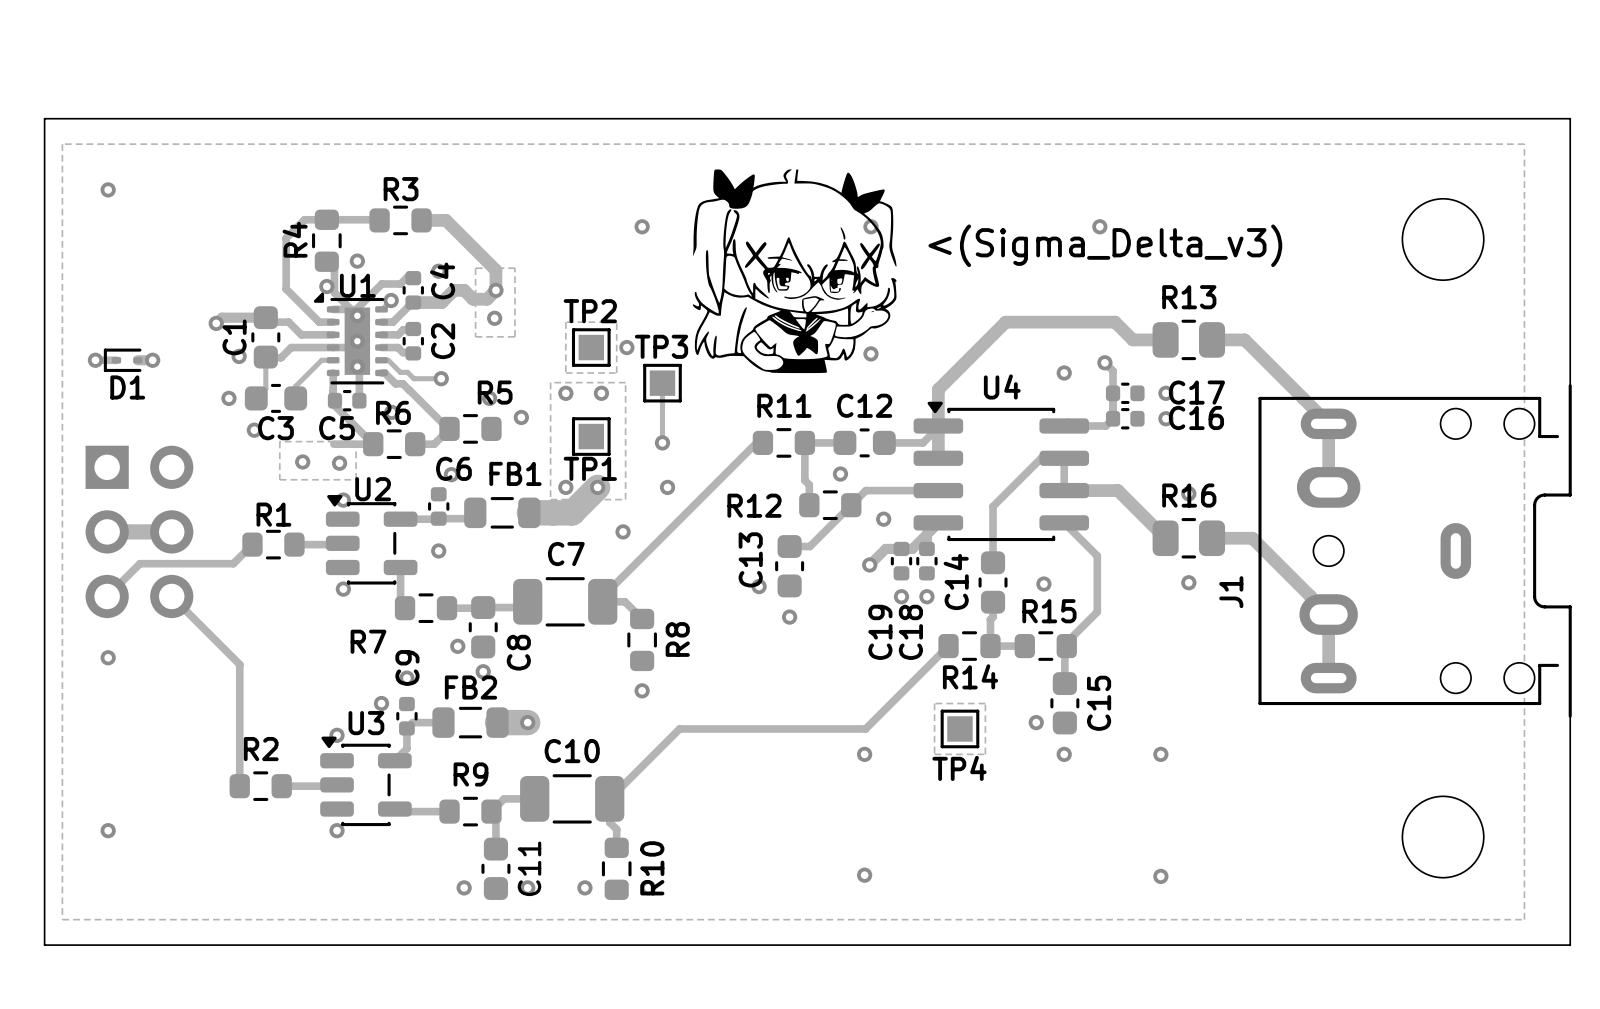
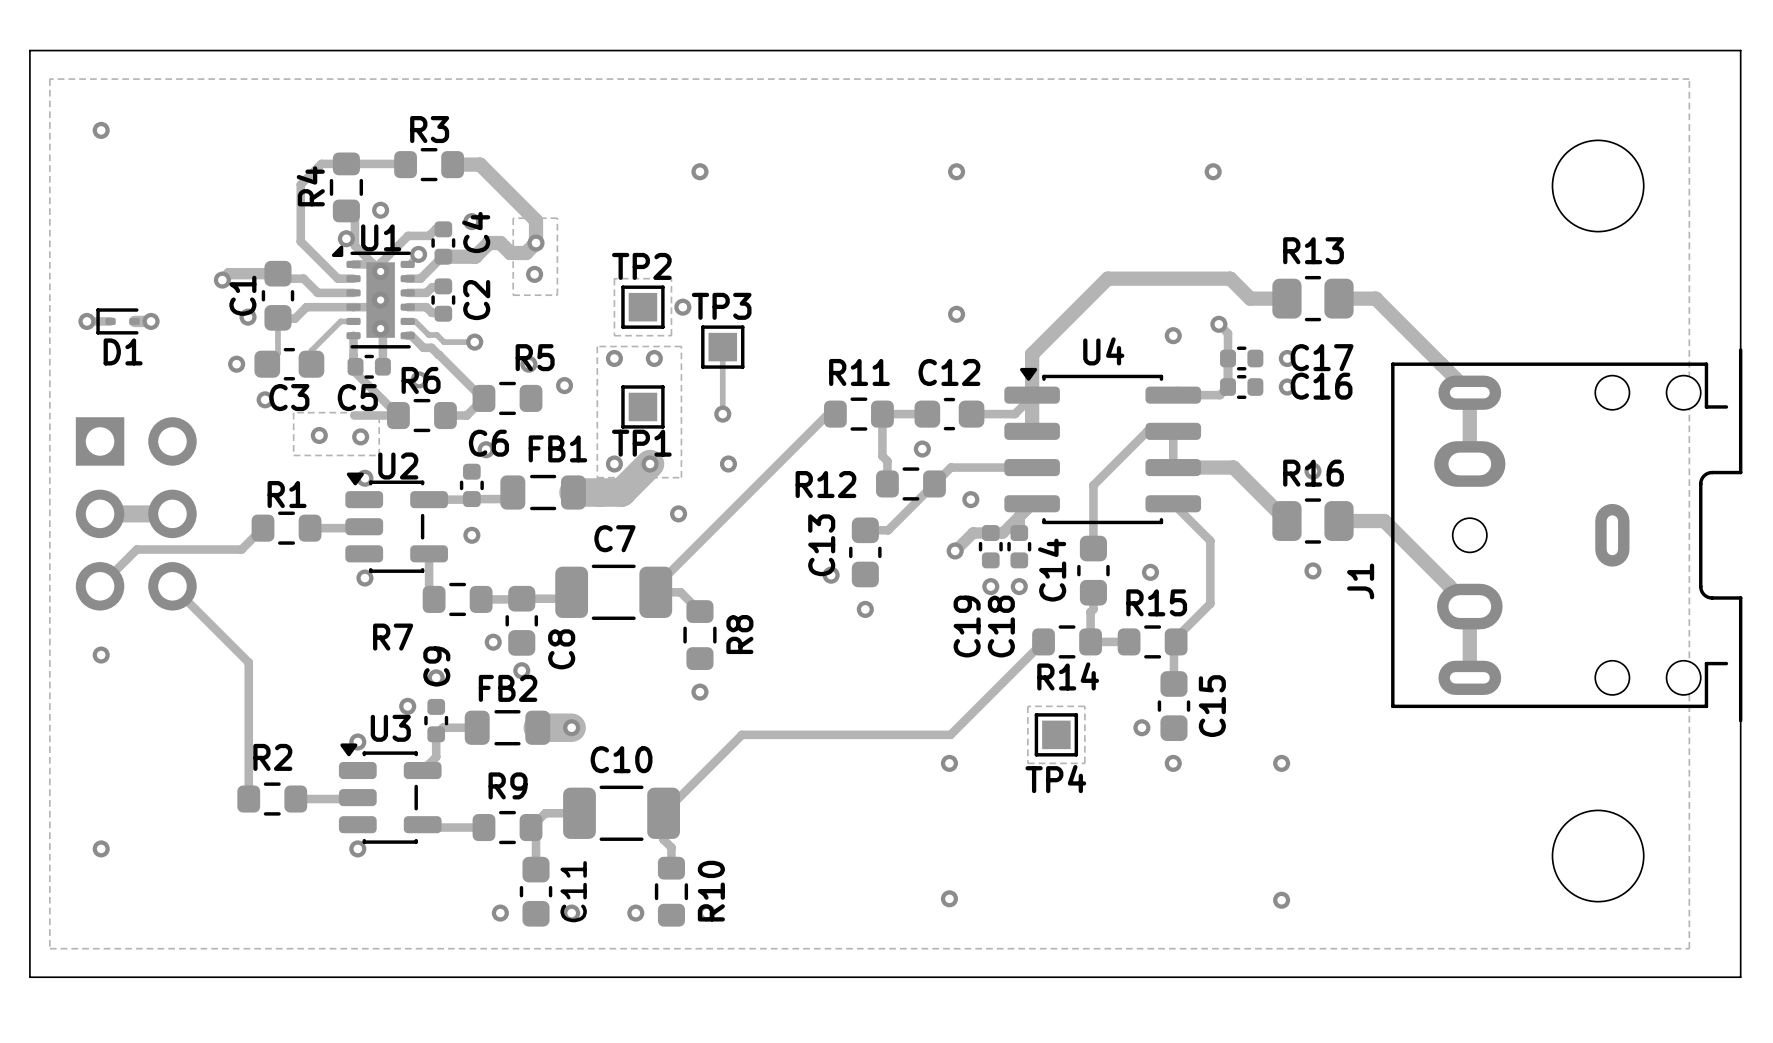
drawing: [692, 169, 897, 374] -> none
text: <(Sigma_Delta_v3) (1105, 245) -> none

